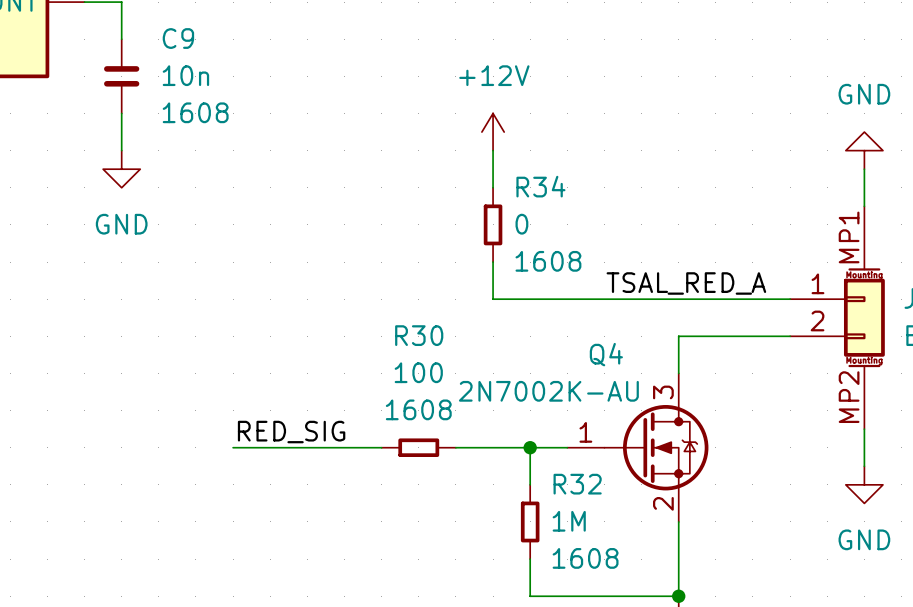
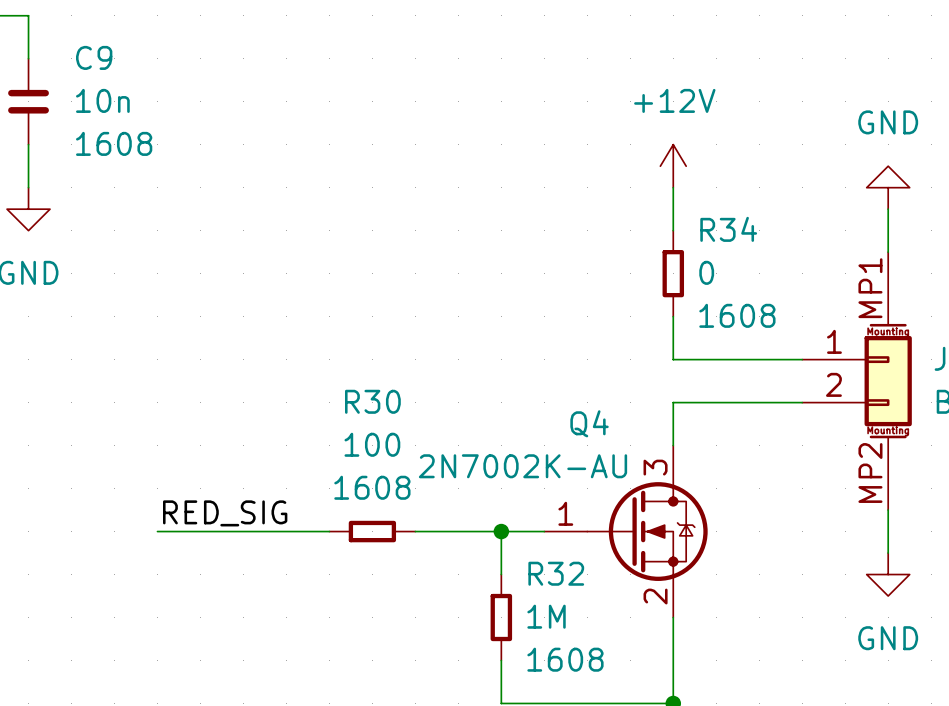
power symbol position: +12V (493, 132) -> +12V (673, 166)
wire: (493, 150) (493, 187) -> (673, 187) (673, 230)
R34 position: (493, 224) -> (673, 273)
wire: (493, 262) (493, 299) (678, 299) -> (673, 316) (673, 359)
label: TSAL_RED_A (686, 283) -> none

